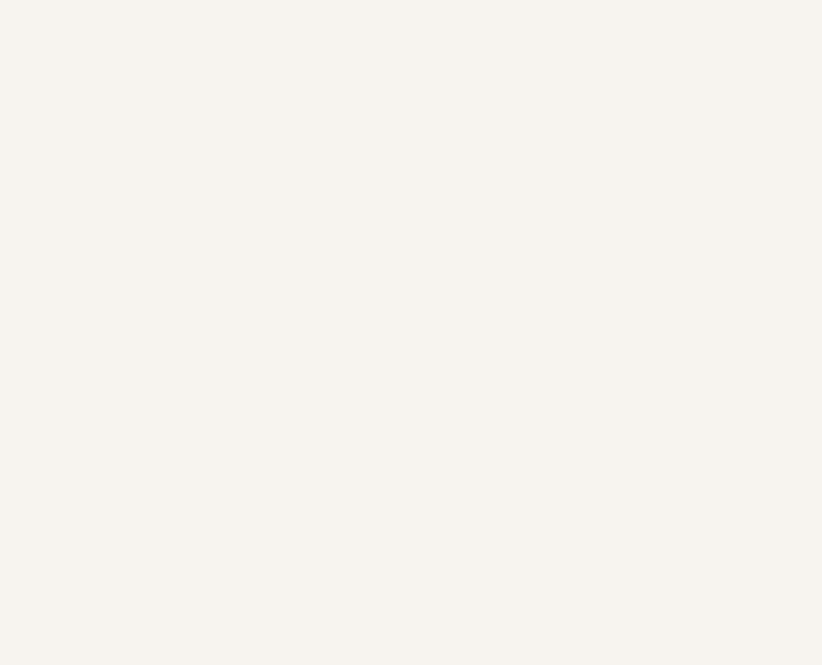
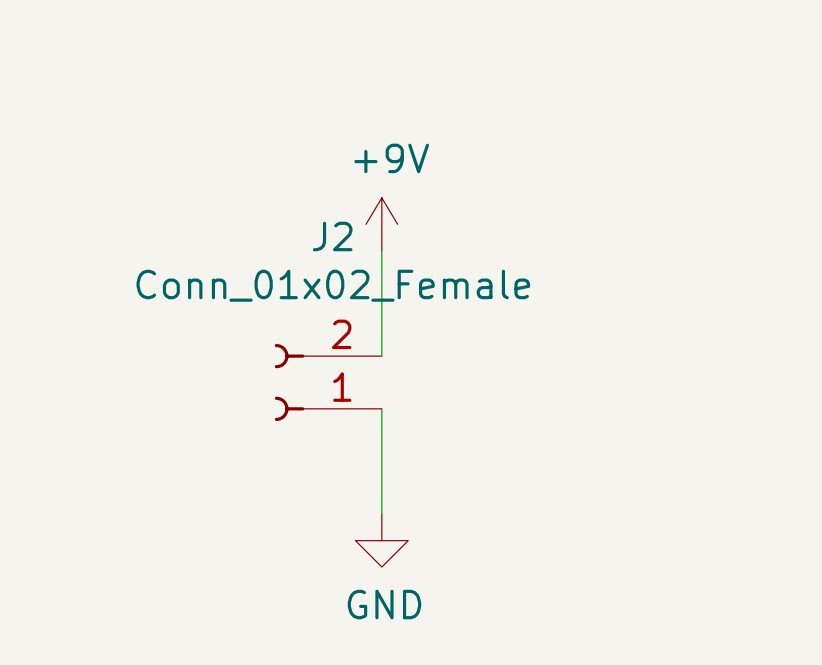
power symbol: none -> +9V (381, 224)
wire: none -> (381, 250) (381, 356)
J2: none -> Conn_01x02_Female (328, 382)
wire: none -> (381, 408) (381, 514)
power symbol: none -> GND (381, 540)

